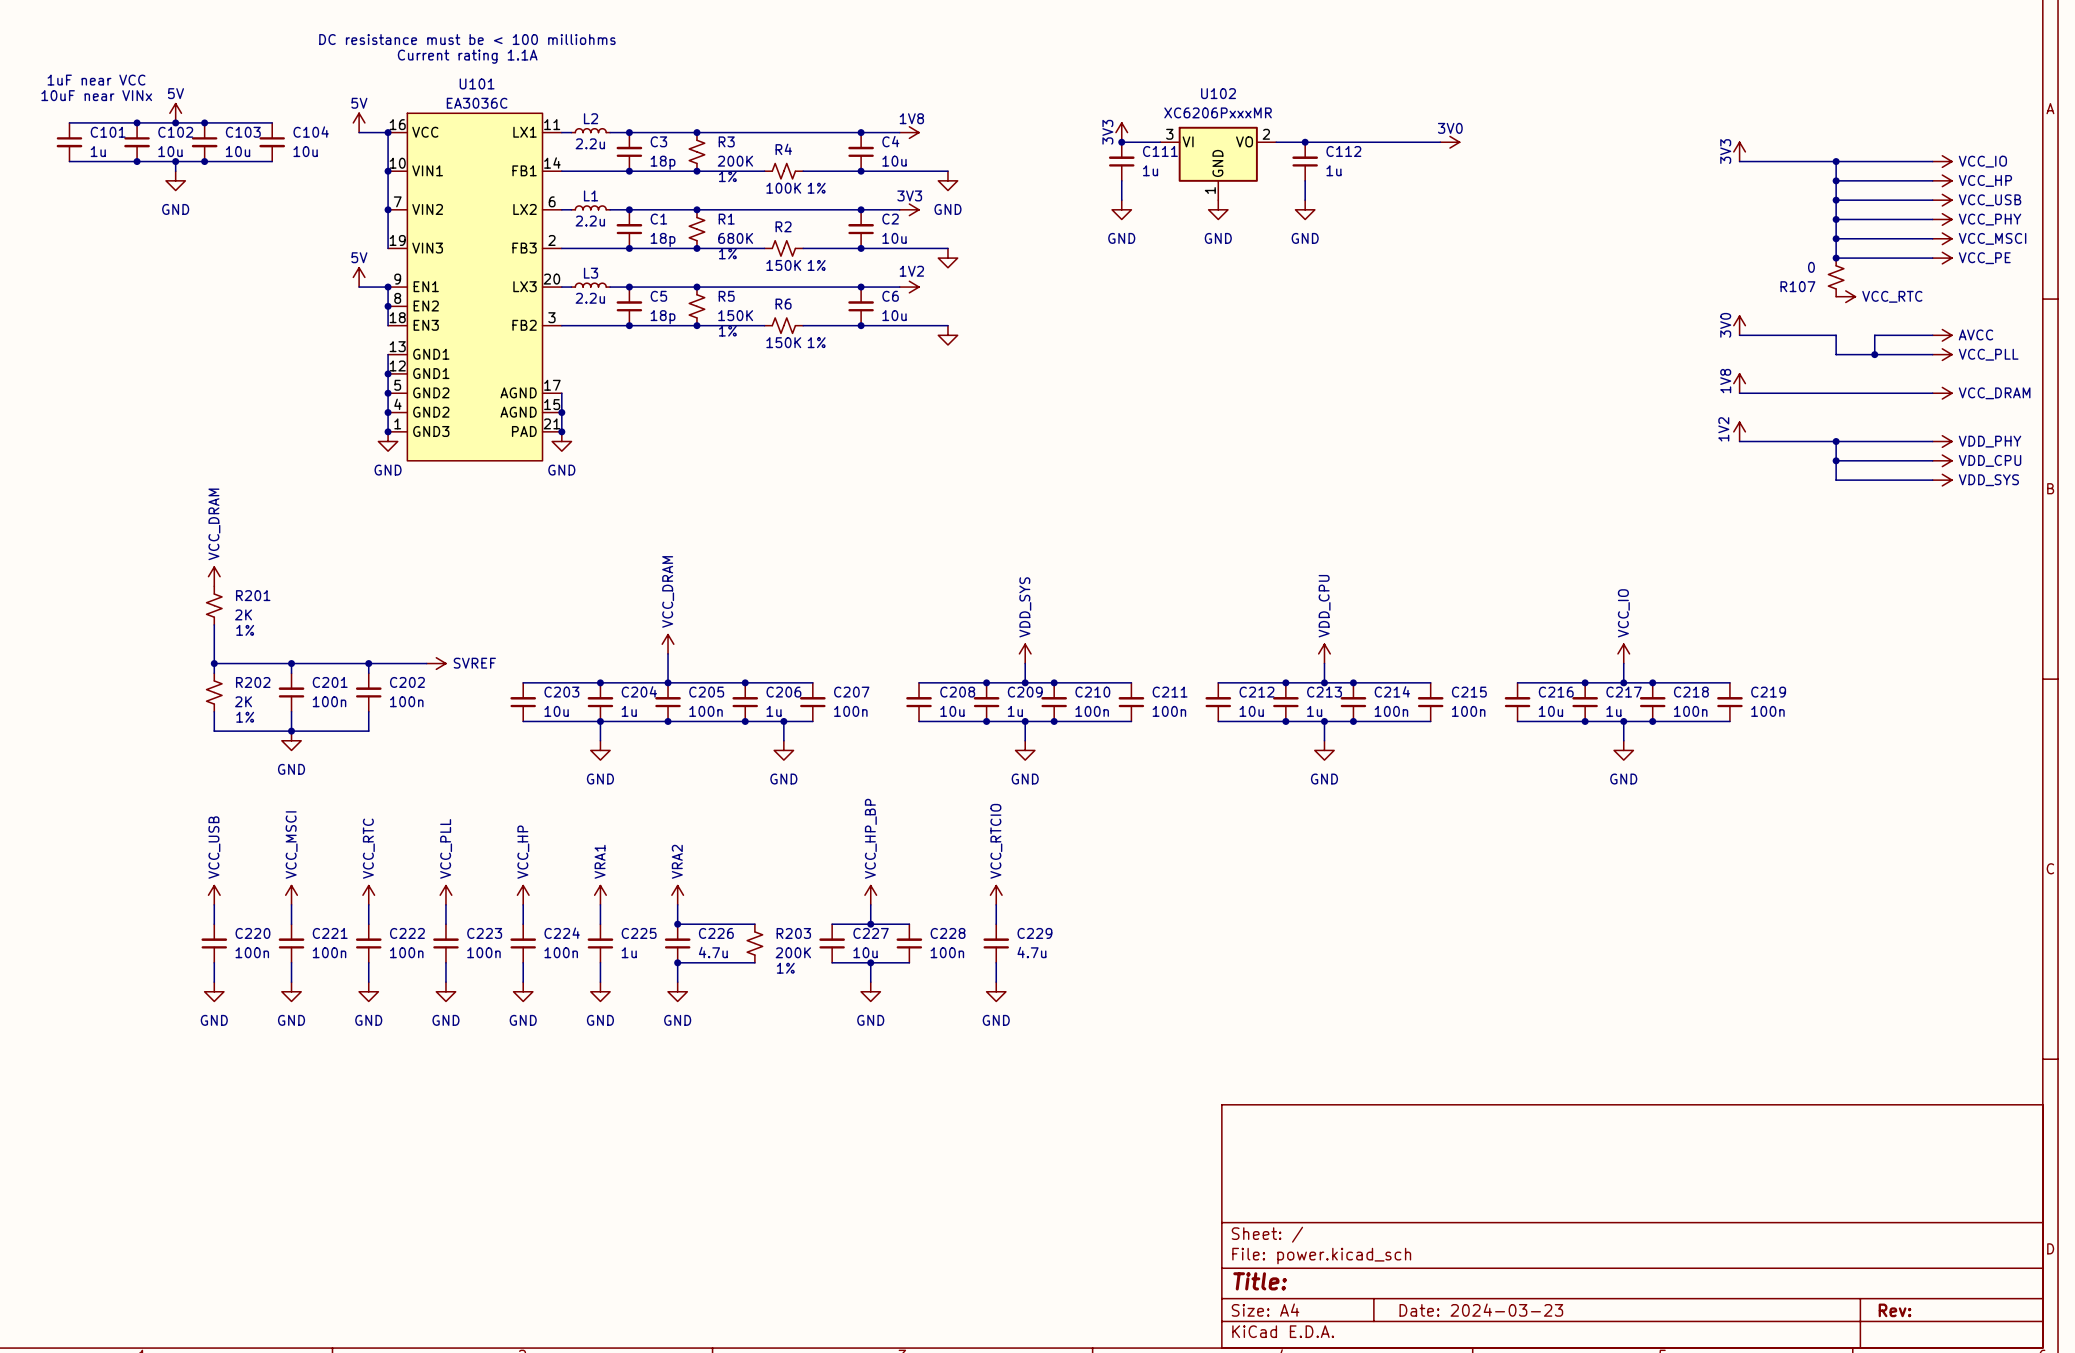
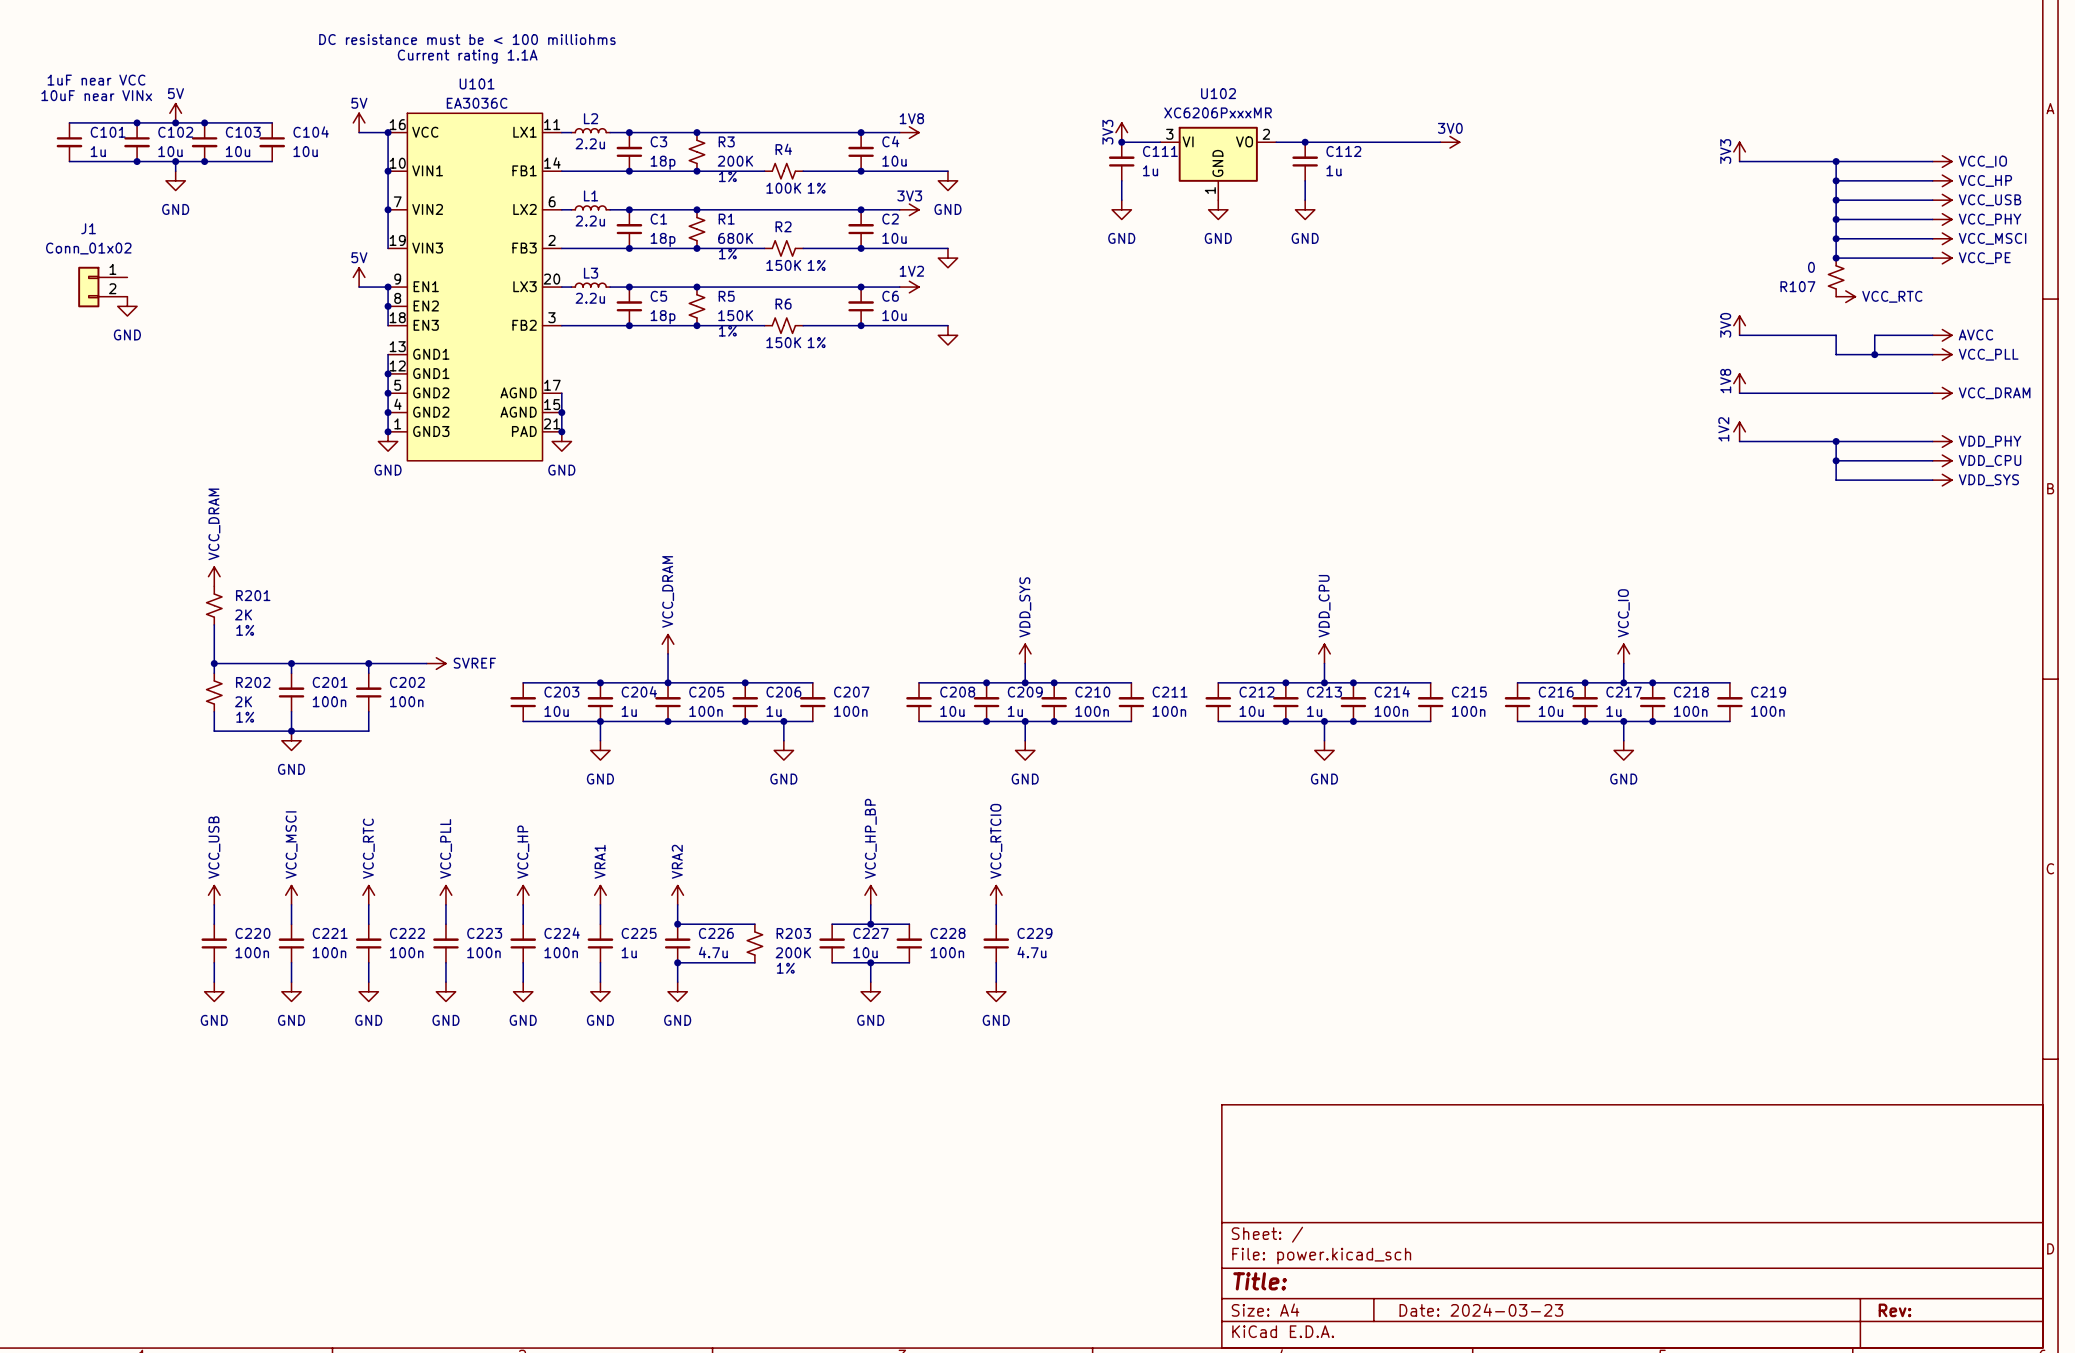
J1: none -> Conn_01x02 (102, 287)
power symbol: none -> GND (127, 306)

